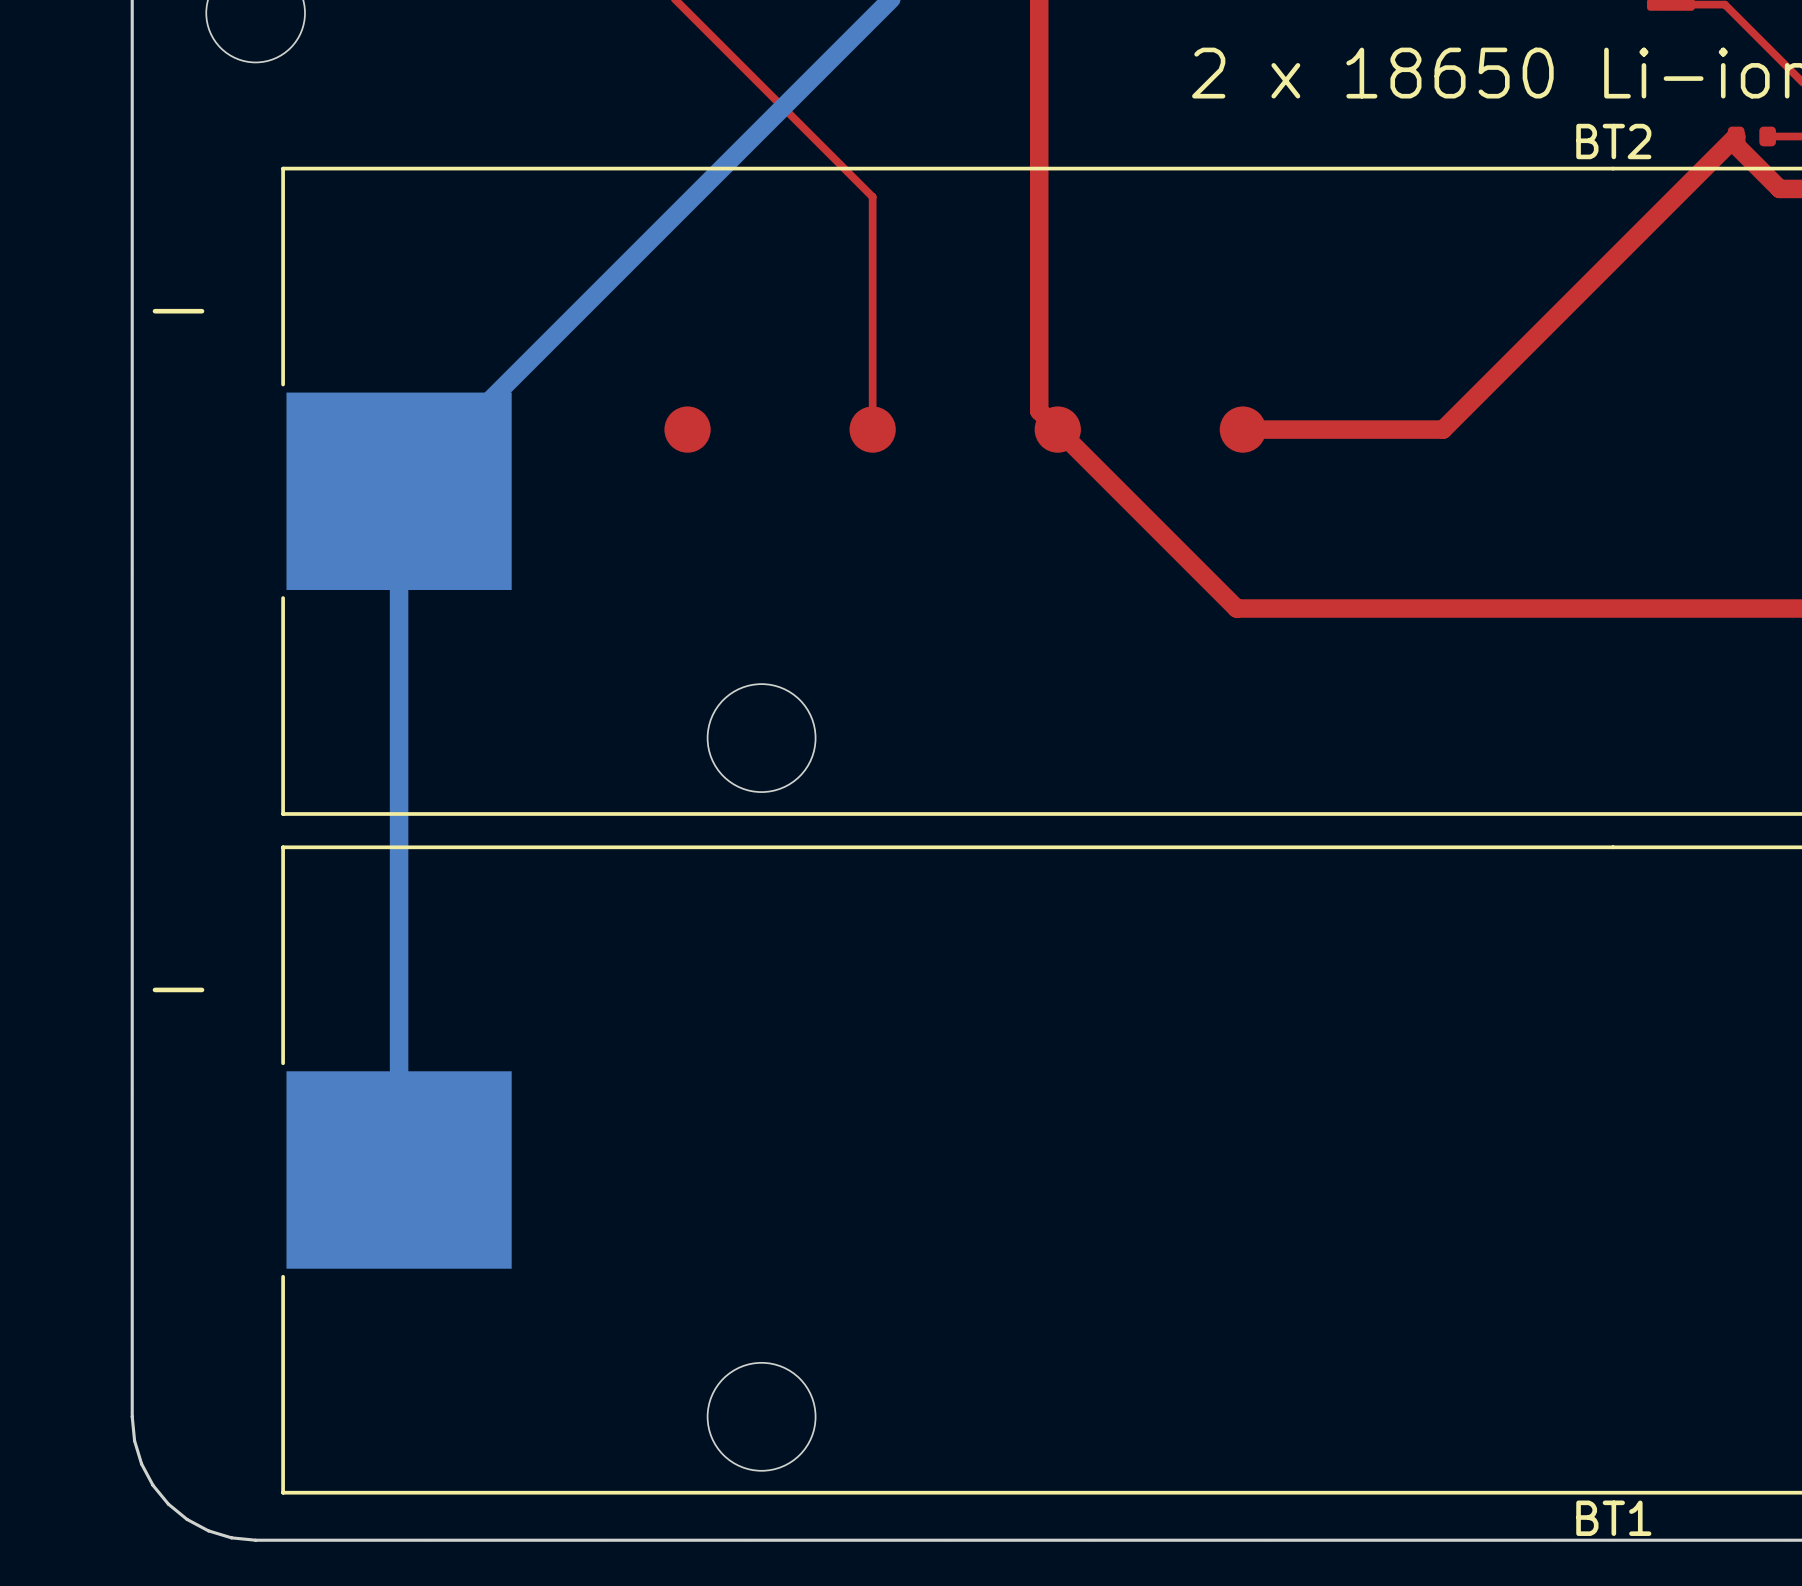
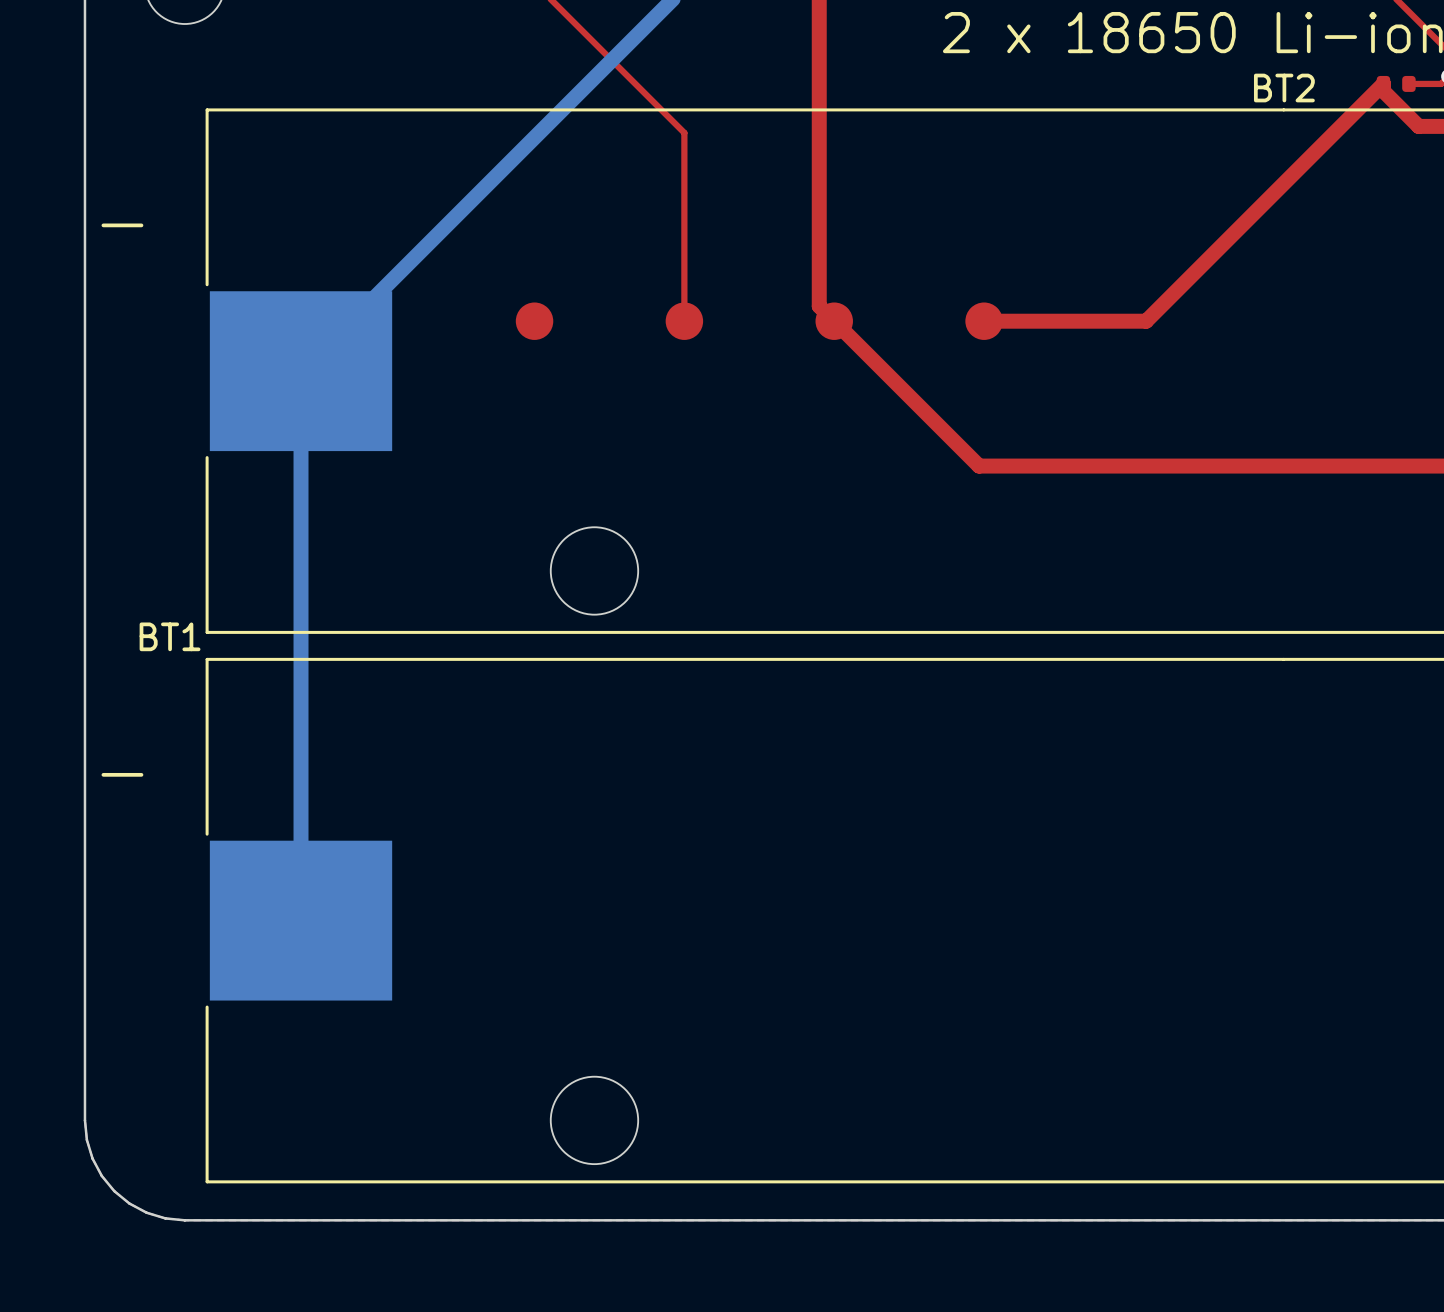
BT1 name position: BT1 (1613, 1518) -> BT1 (170, 636)

